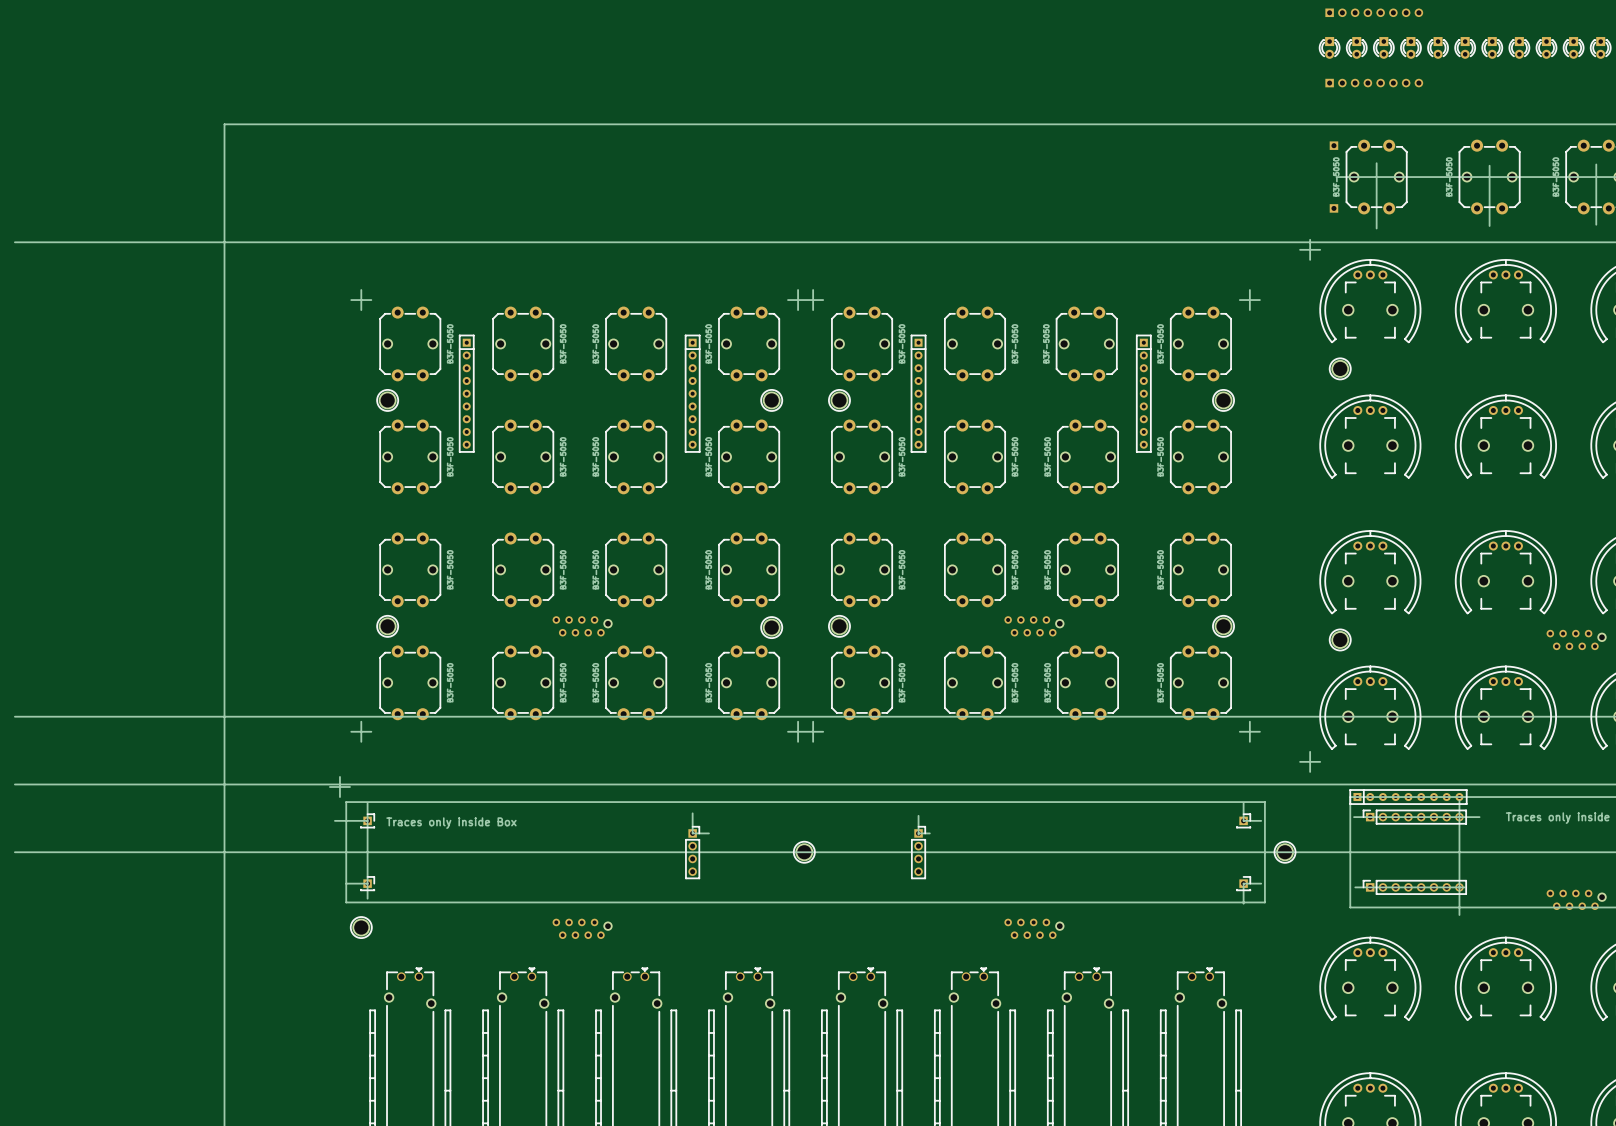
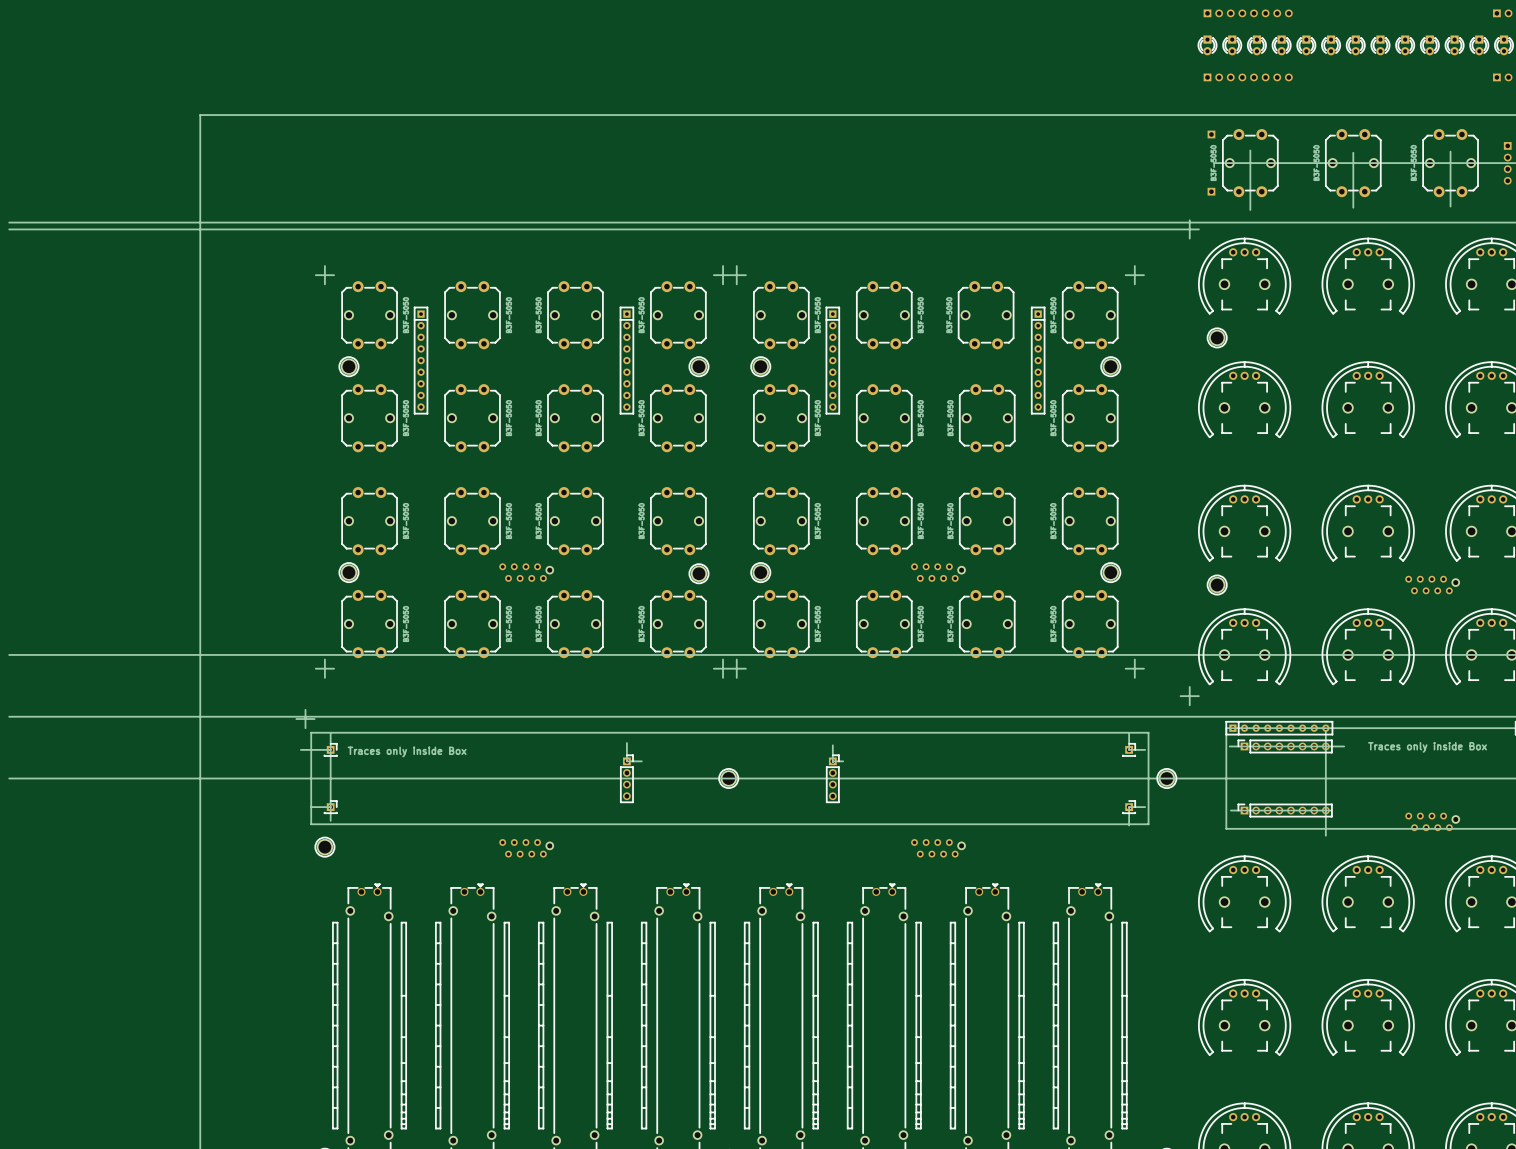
line: none -> (9, 229) (1180, 229)

